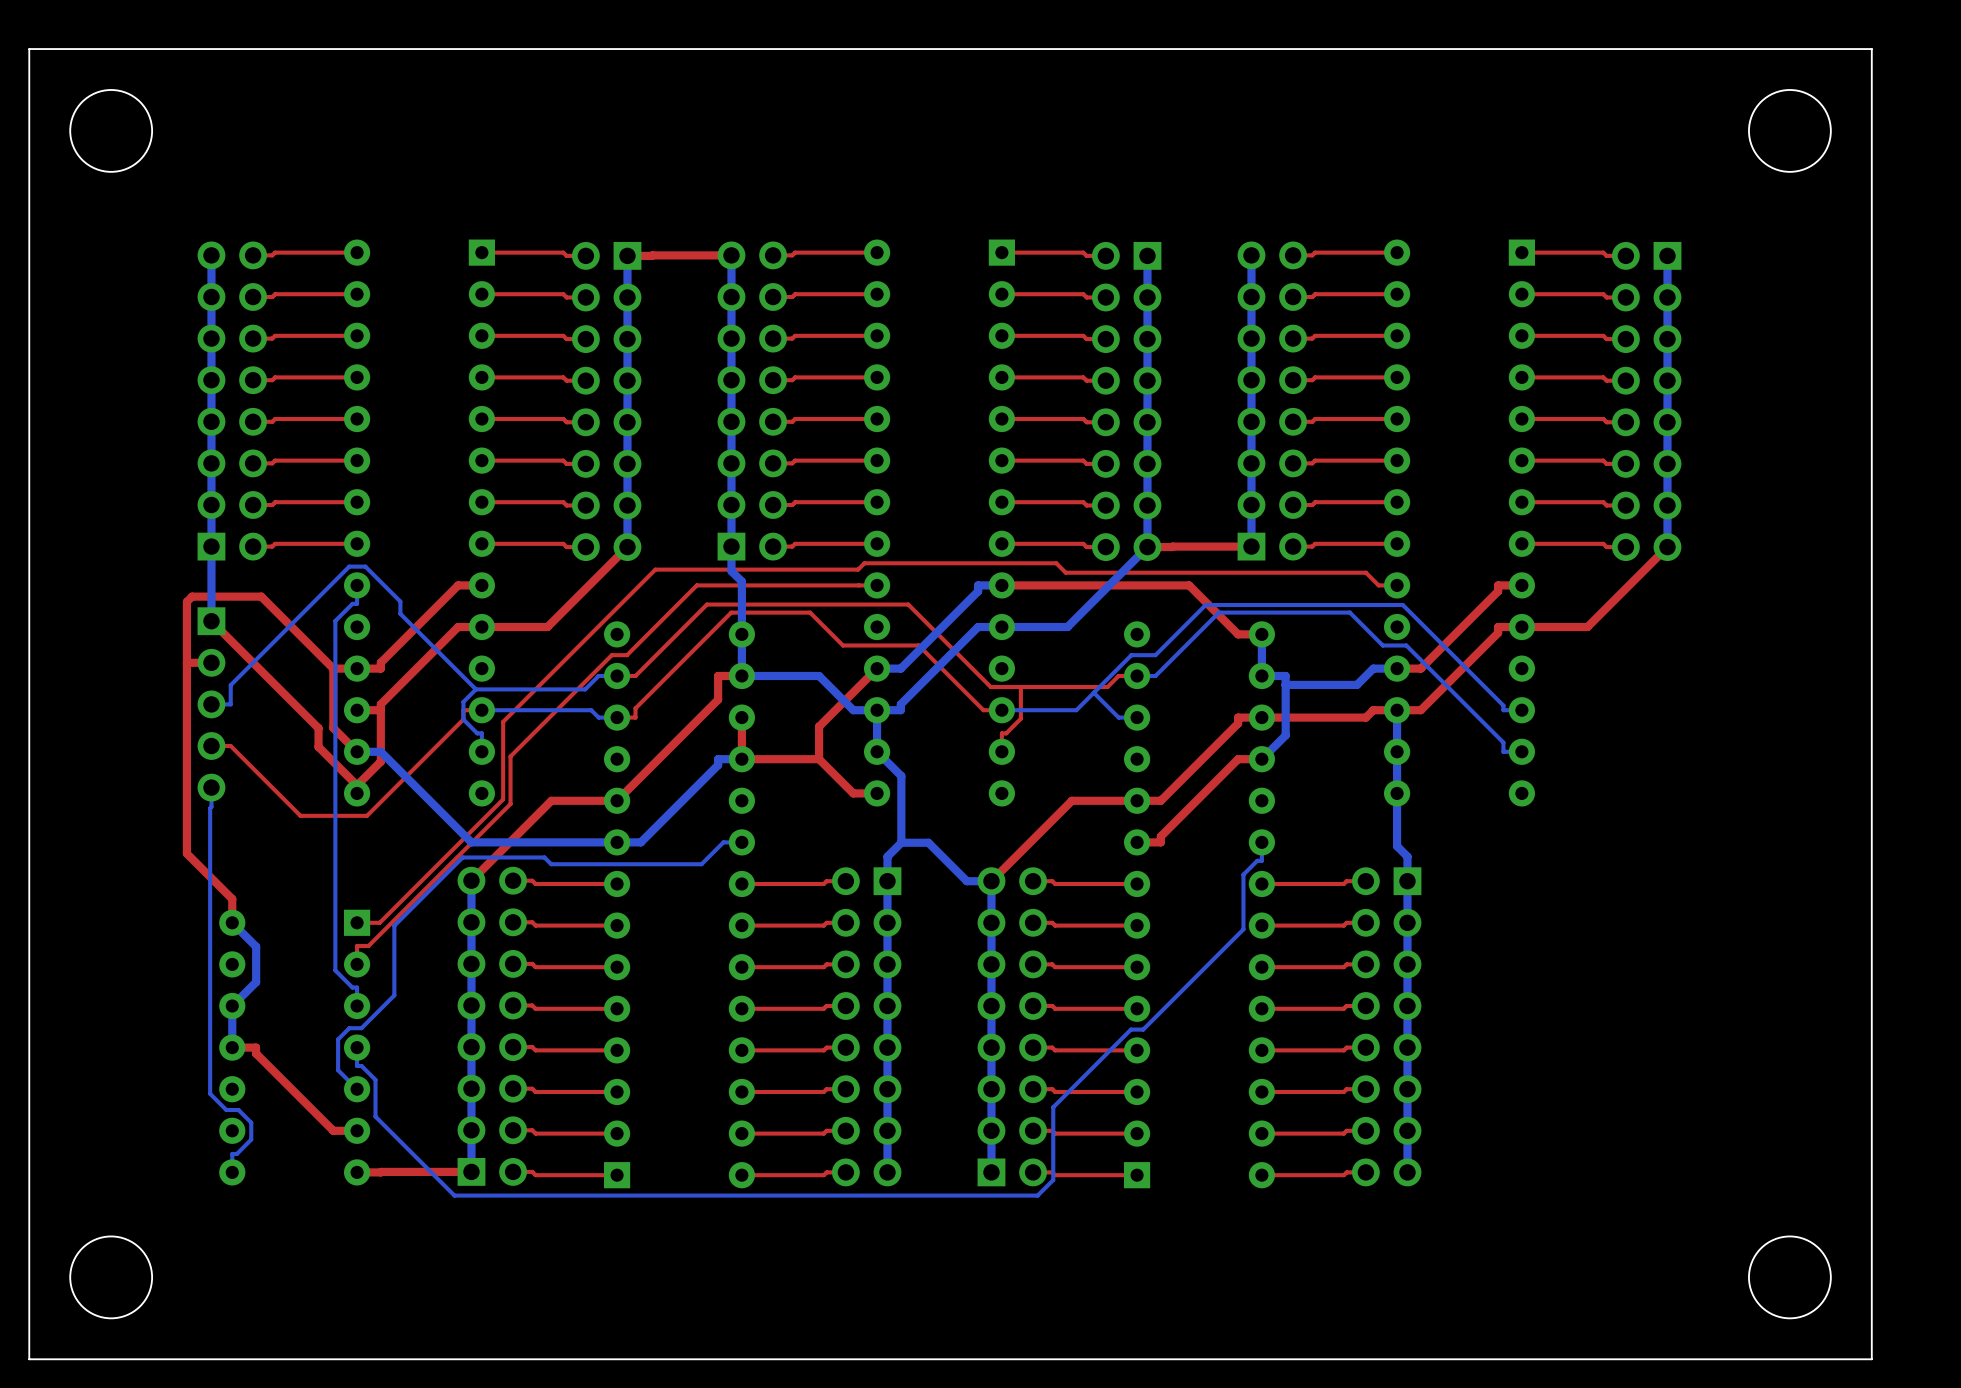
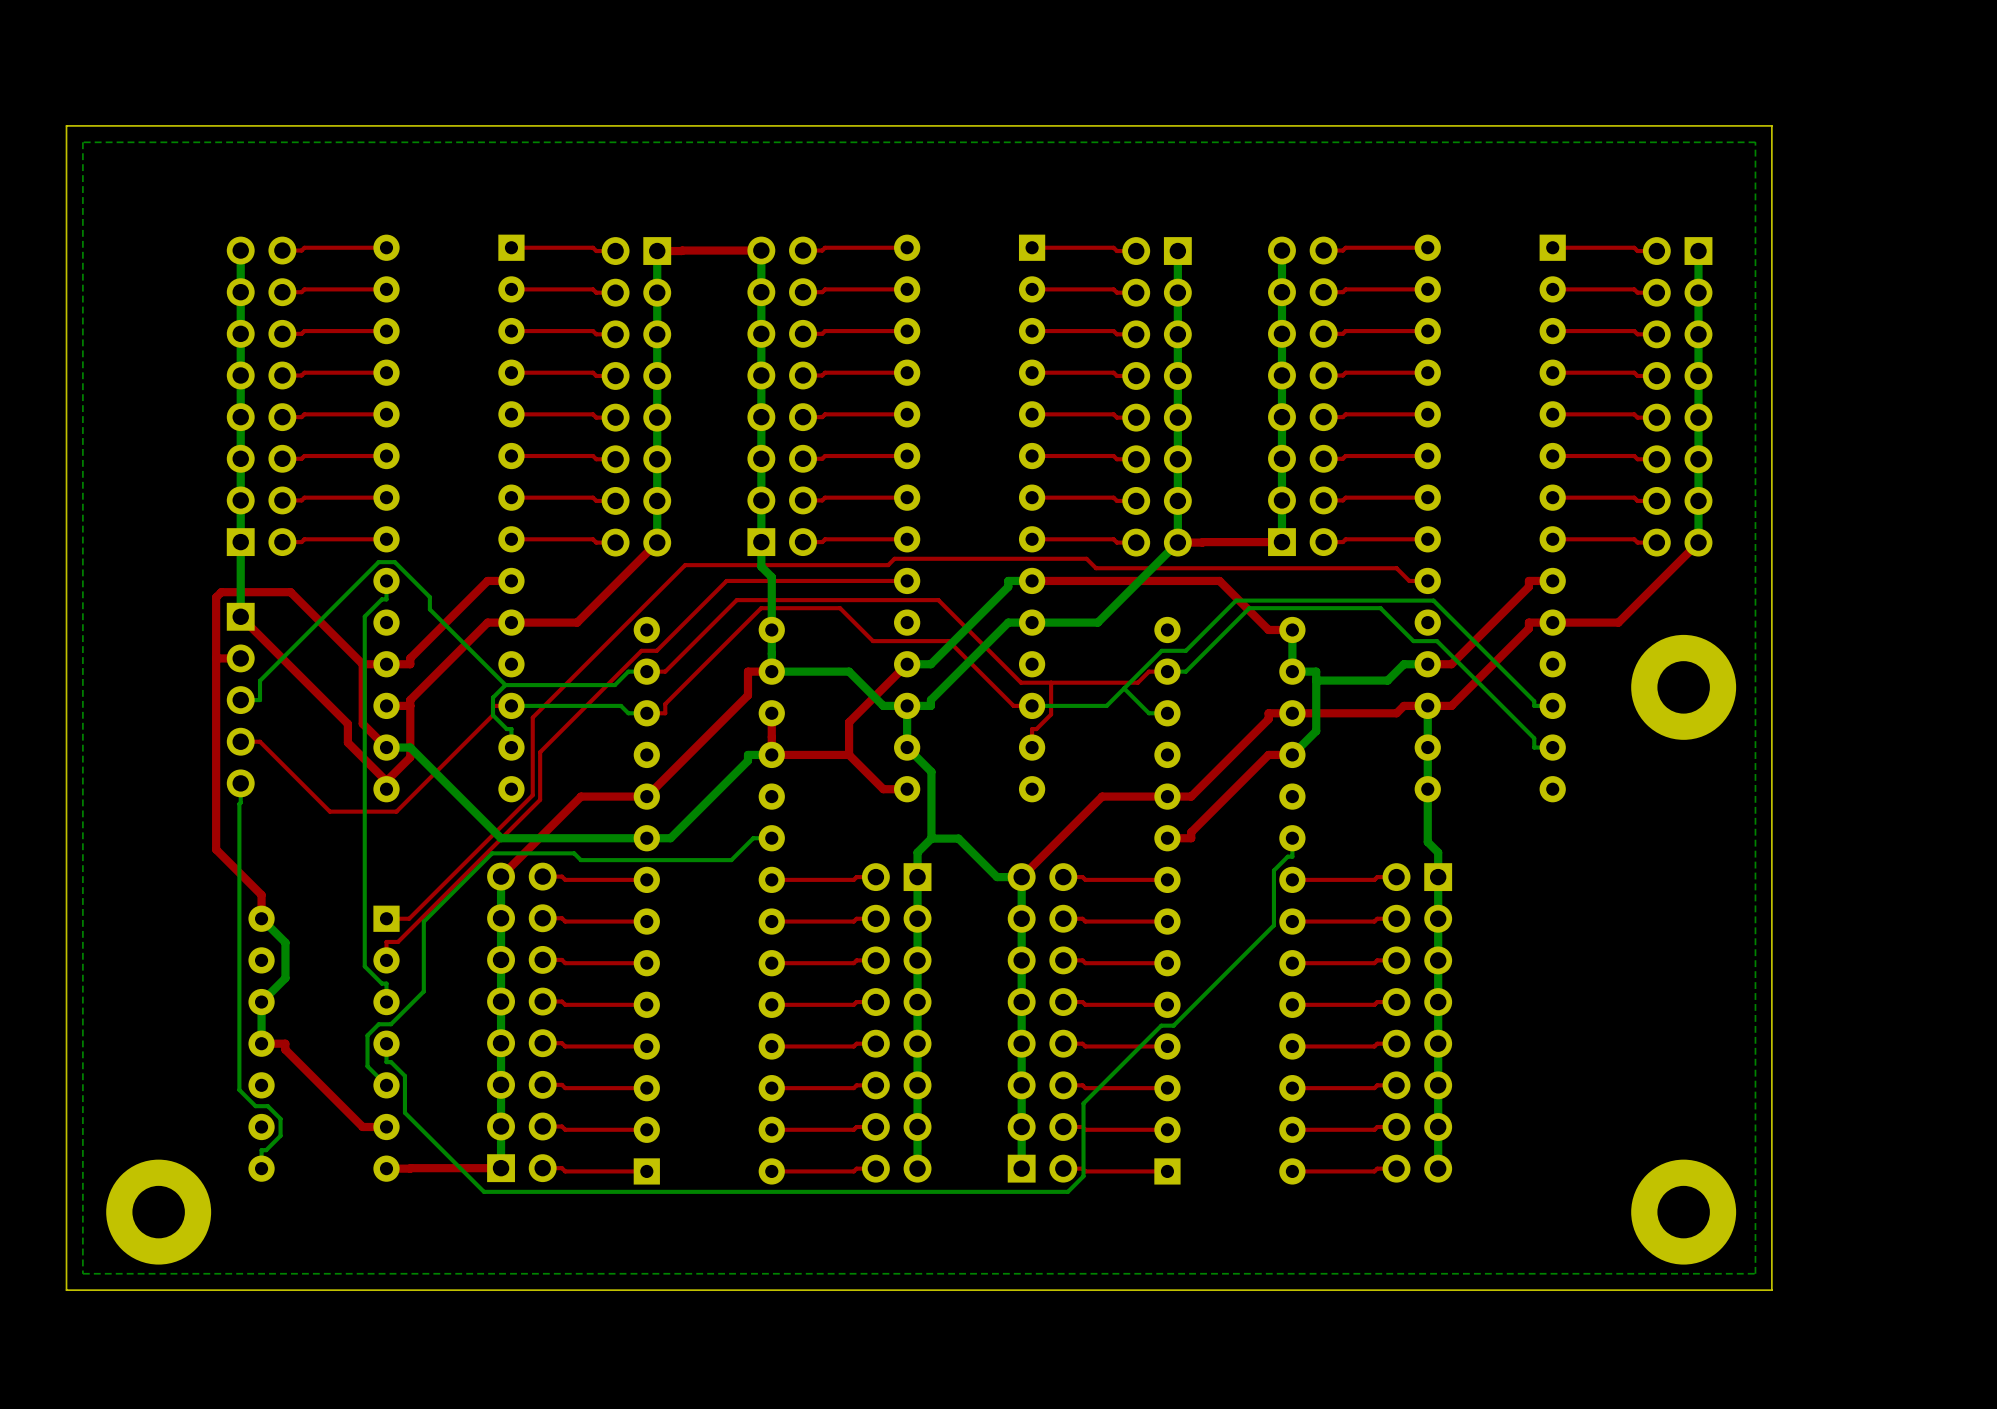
board edge: (1871, 49) (29, 49) (29, 1359) (1871, 1359) (1871, 49) -> (1771, 125) (1771, 1290) (66, 1290) (66, 125) (1771, 125)
round board edge: [69, 89, 153, 173] -> none
round board edge: [1748, 89, 1832, 173] -> none
bottom zone outline: none -> (1755, 142) (1755, 1273) (82, 1273) (82, 142) (1755, 142)
part: none -> (1683, 687)
part: none -> (158, 1212)
part: none -> (1683, 1212)
round board edge: [69, 1236, 153, 1319] -> none
round board edge: [1748, 1236, 1832, 1319] -> none

